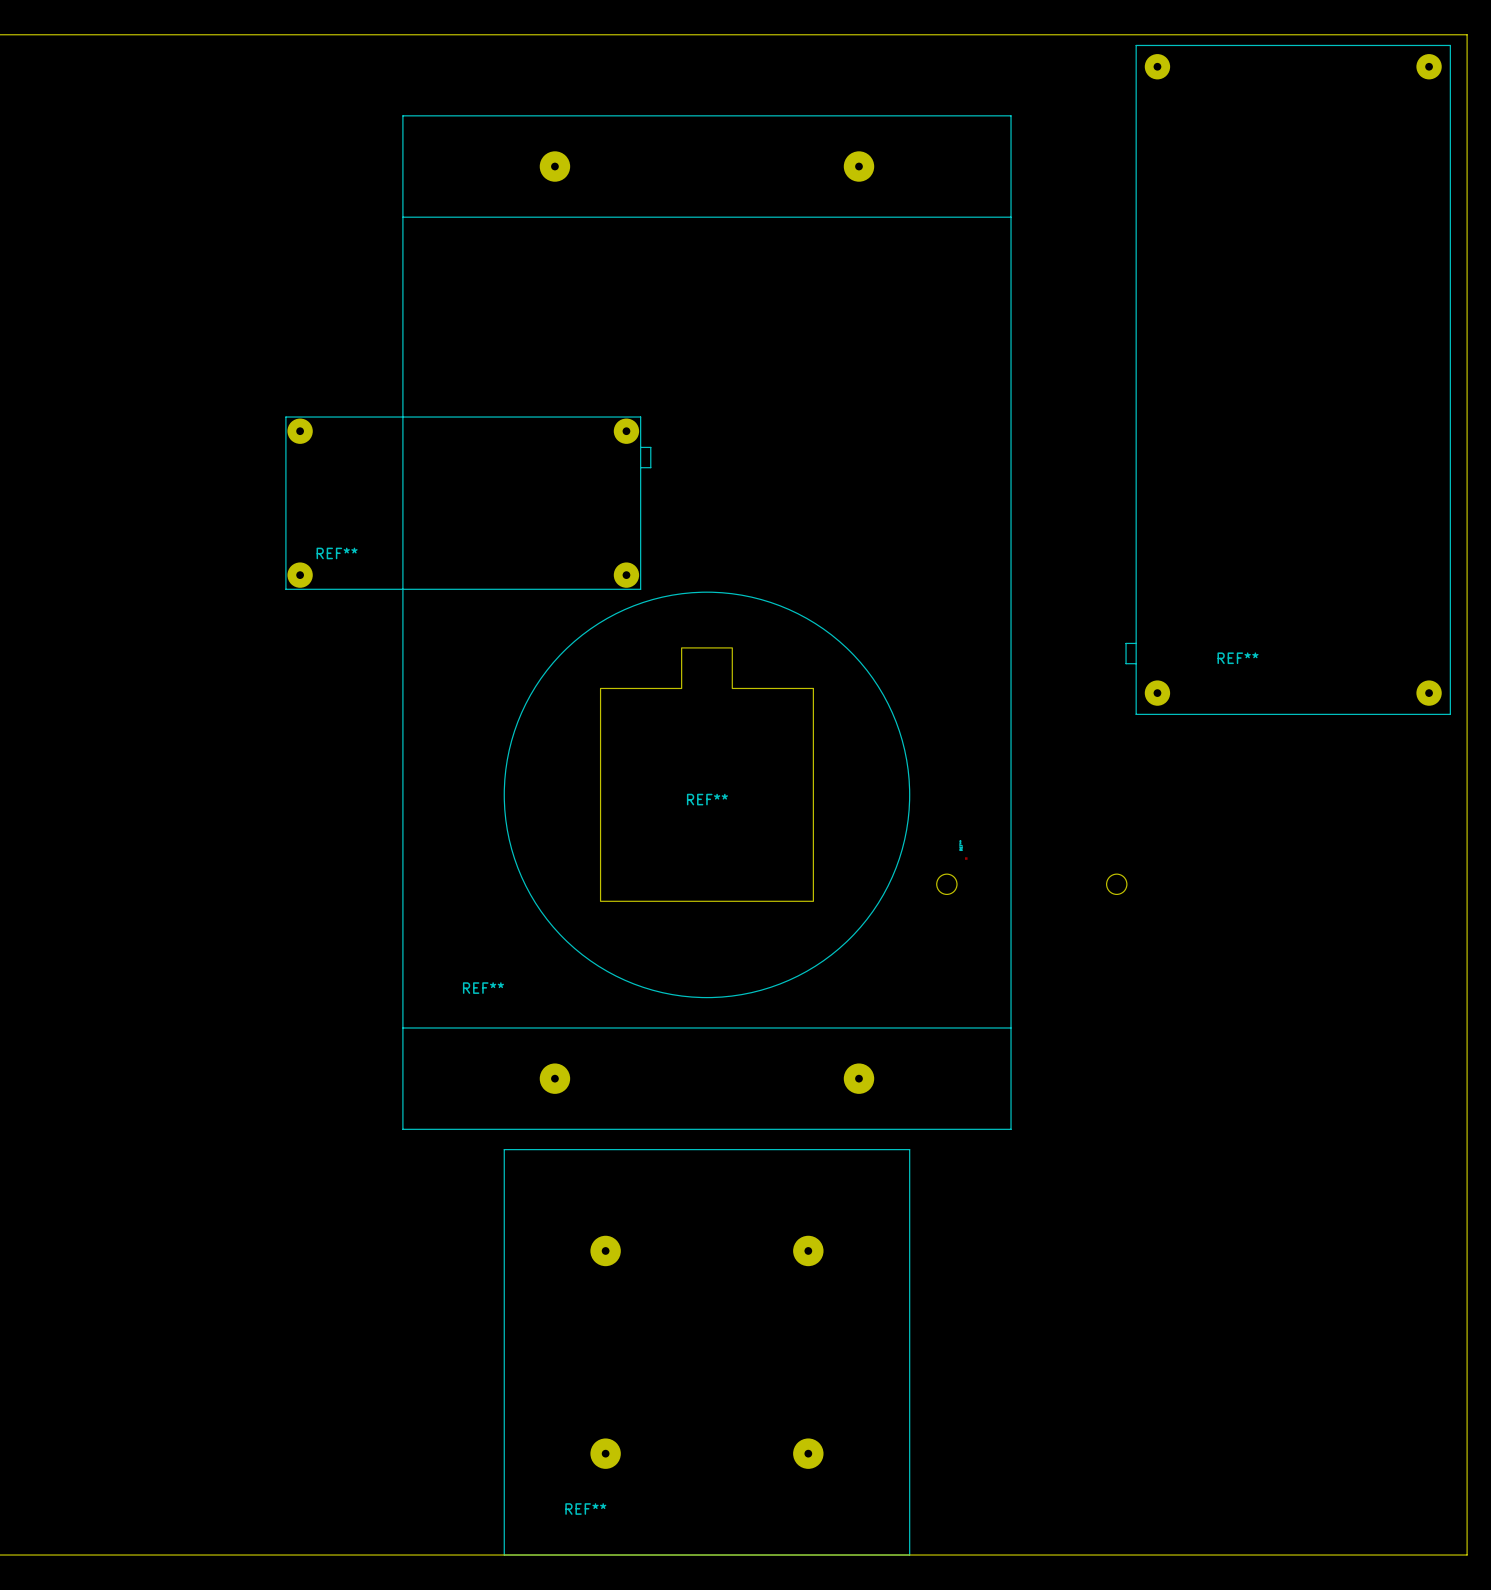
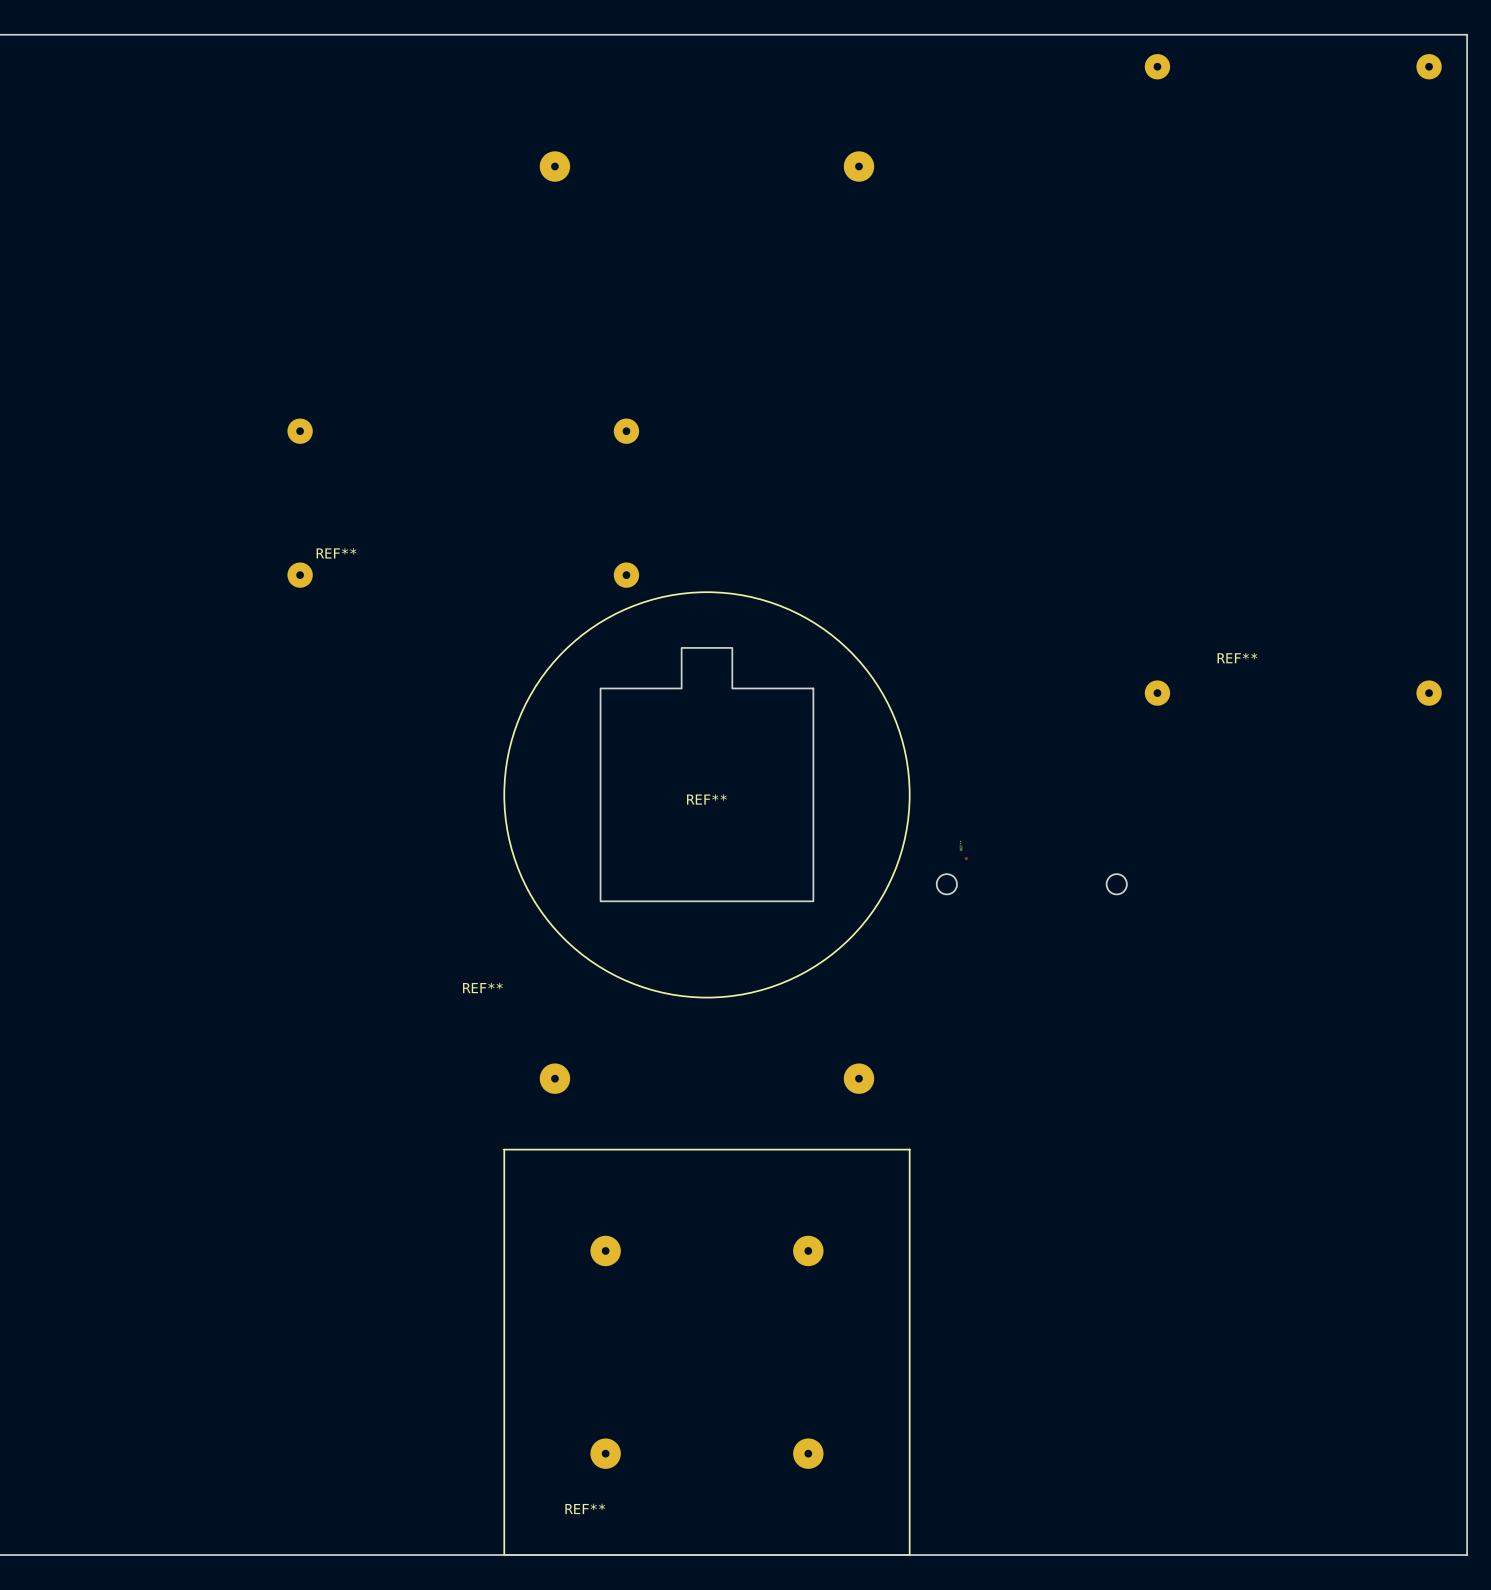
REF** footprint: [1125, 44, 1451, 715] -> [1144, 54, 1442, 706]
REF** footprint: [402, 115, 1012, 1130] -> [539, 151, 875, 1094]
REF** footprint: [285, 416, 652, 590] -> [287, 418, 640, 588]

